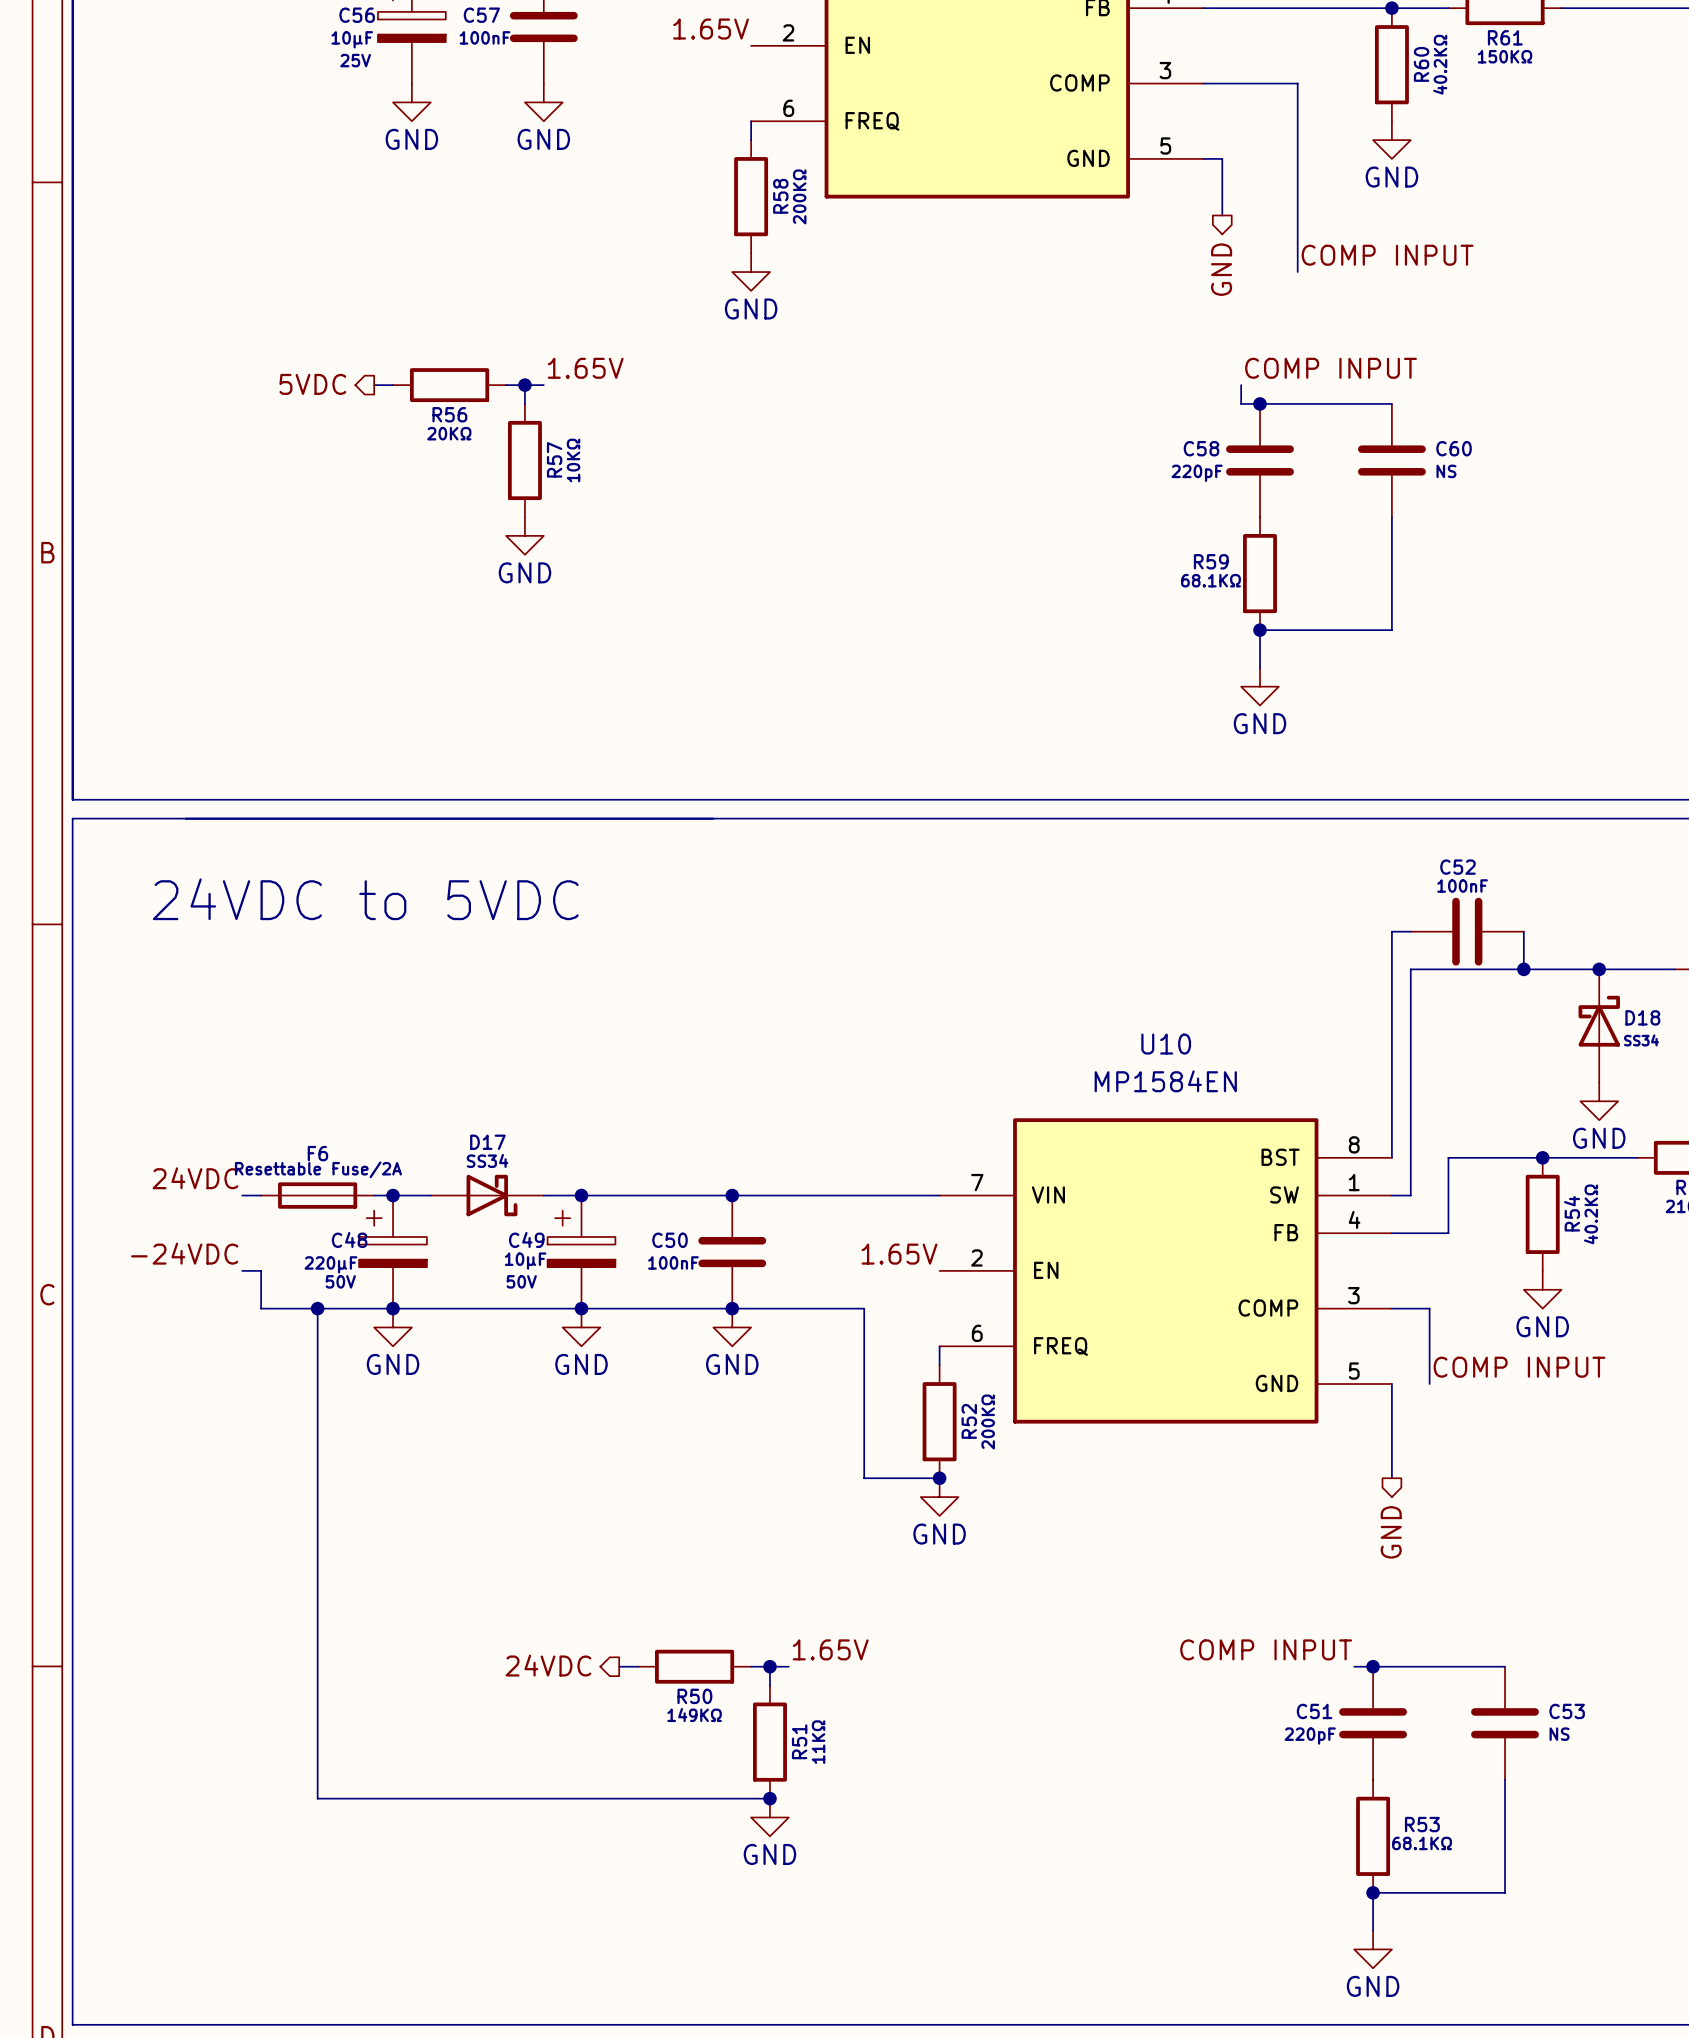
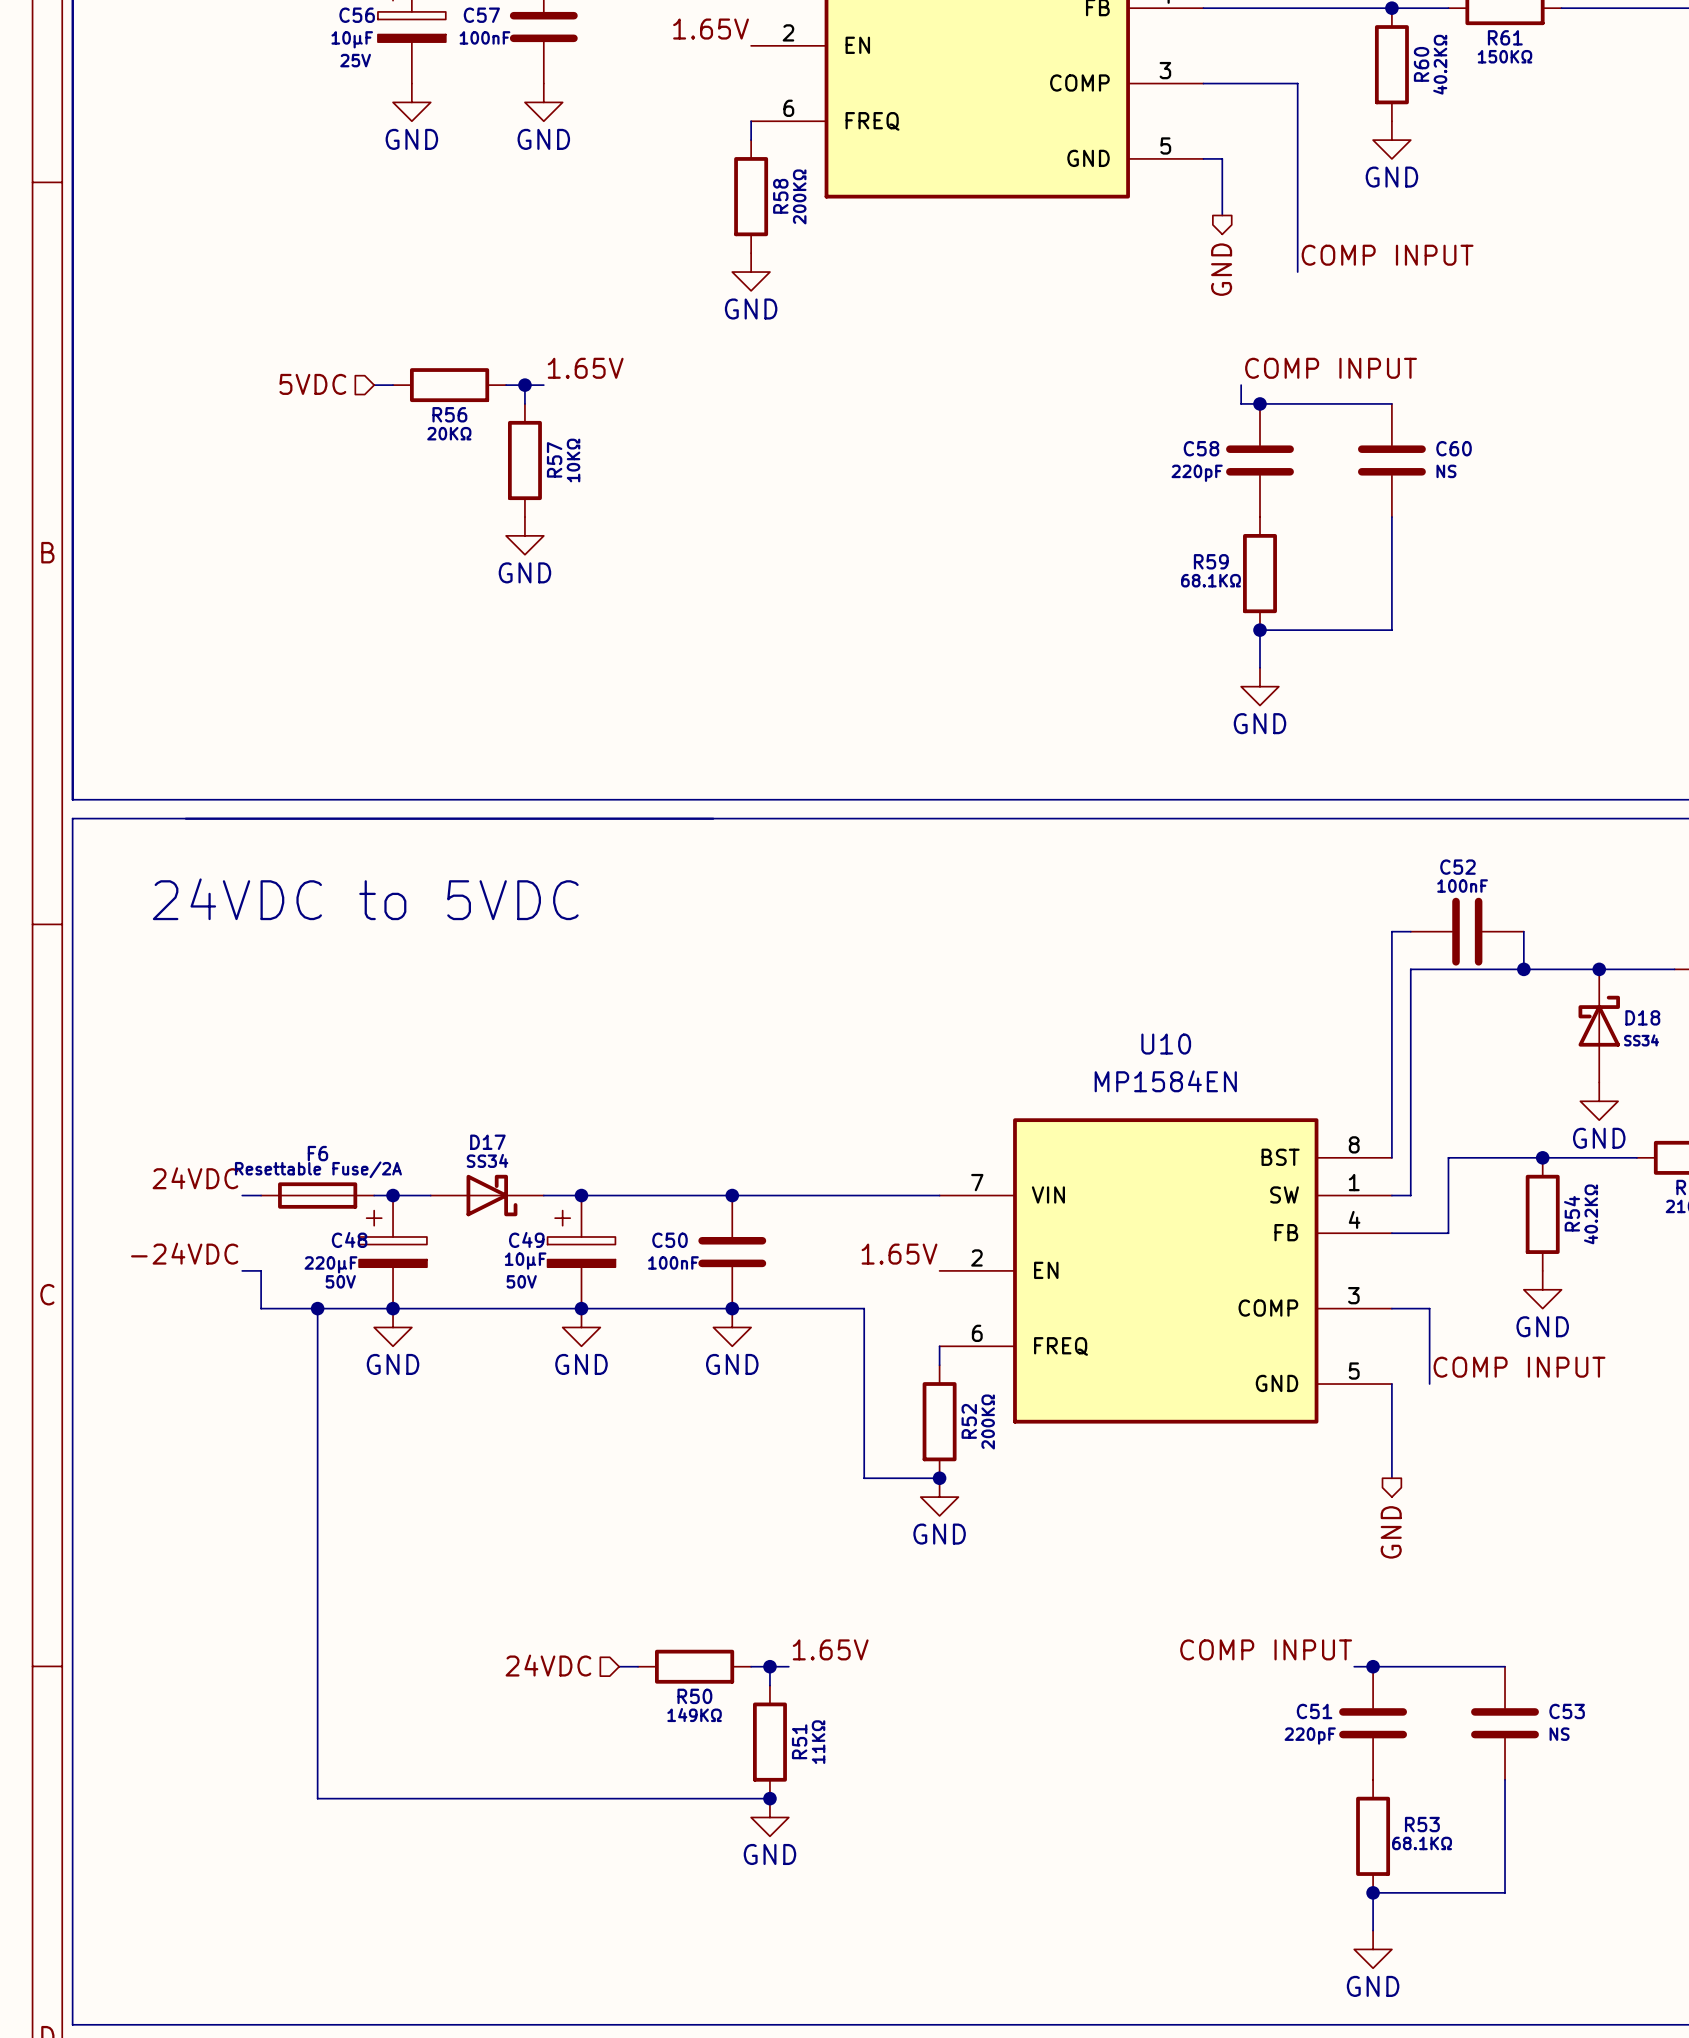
hierarchical label shape: output (312, 384) -> input (312, 384)
hierarchical label shape: output (548, 1665) -> input (548, 1665)

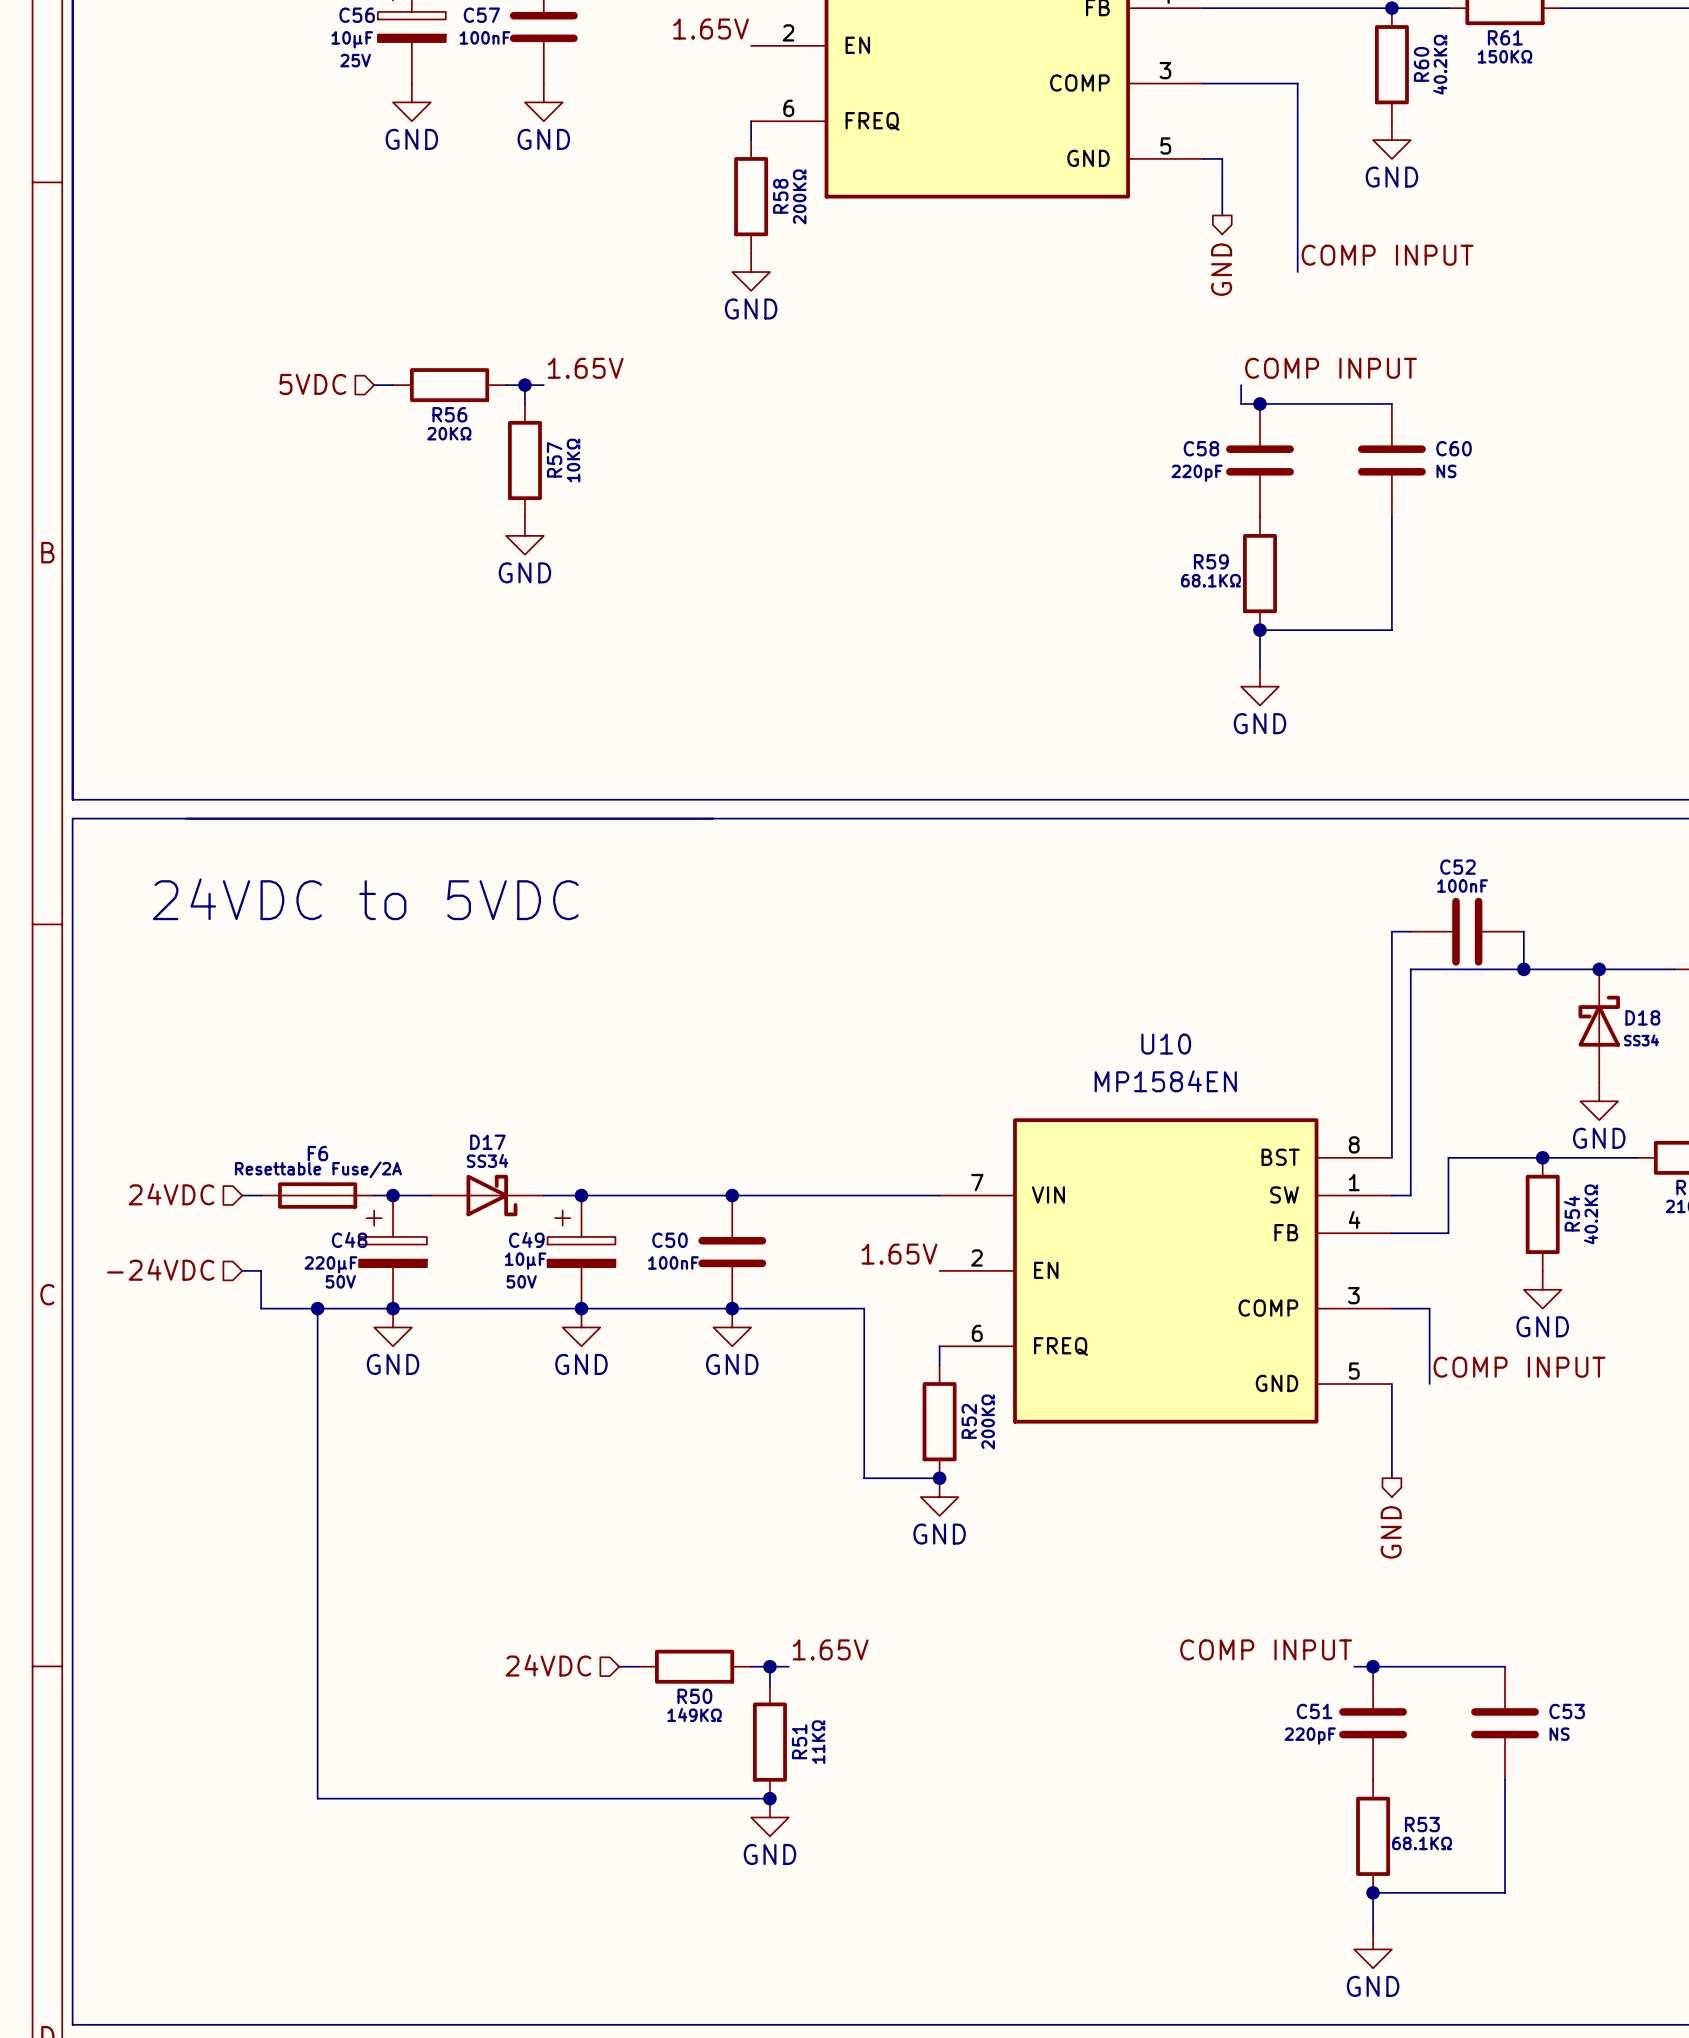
label: 24VDC (195, 1178) -> none
hierarchical label: none -> 24VDC (171, 1194)
label: -24VDC (184, 1253) -> none
hierarchical label: none -> -24VDC (160, 1269)

